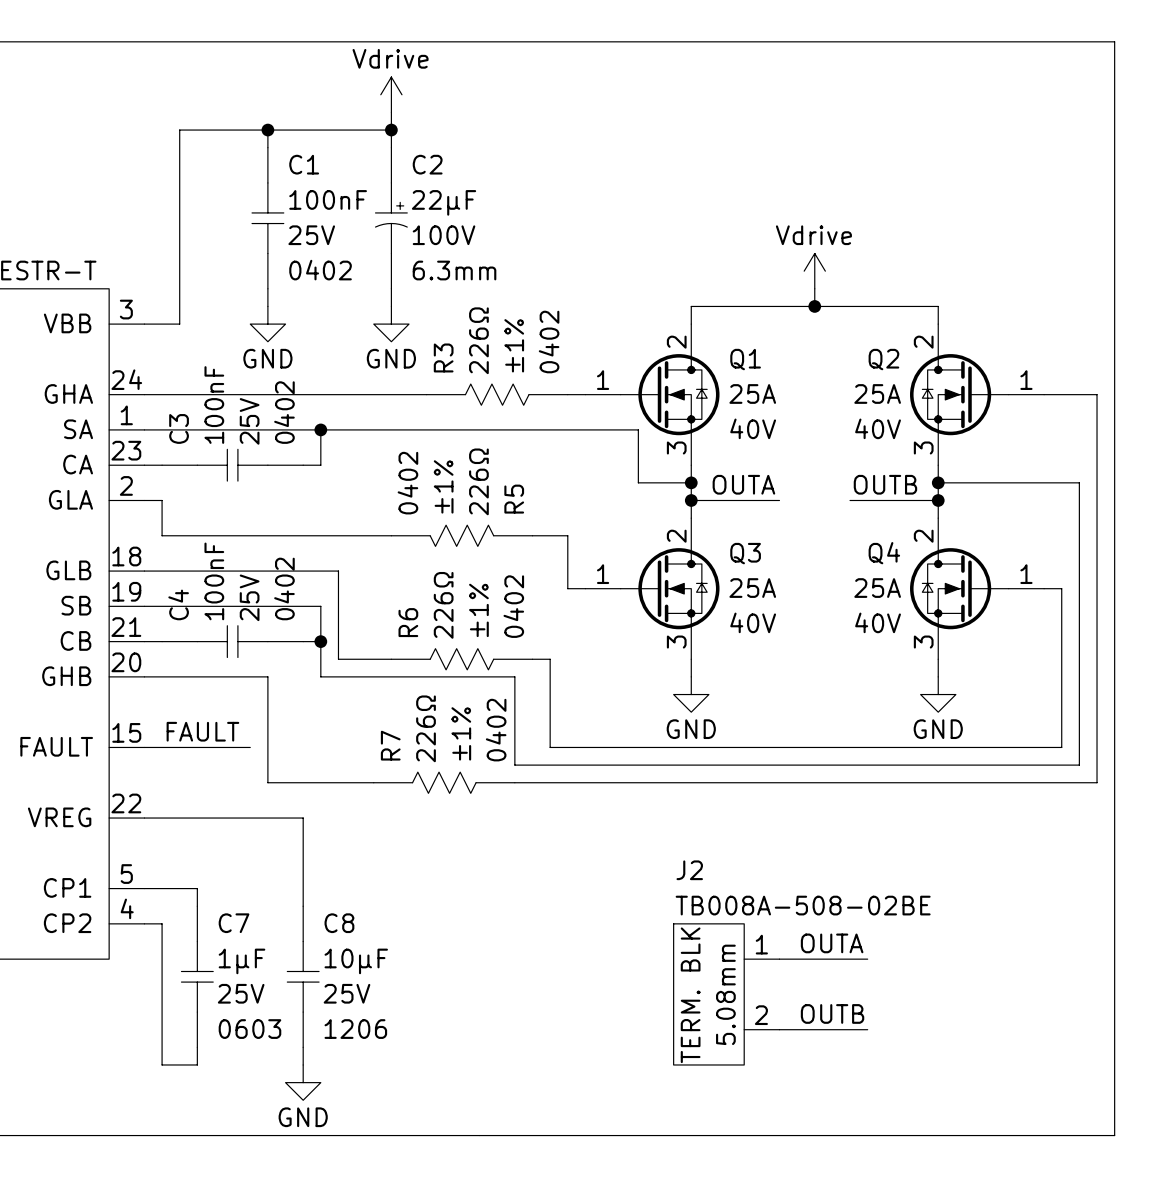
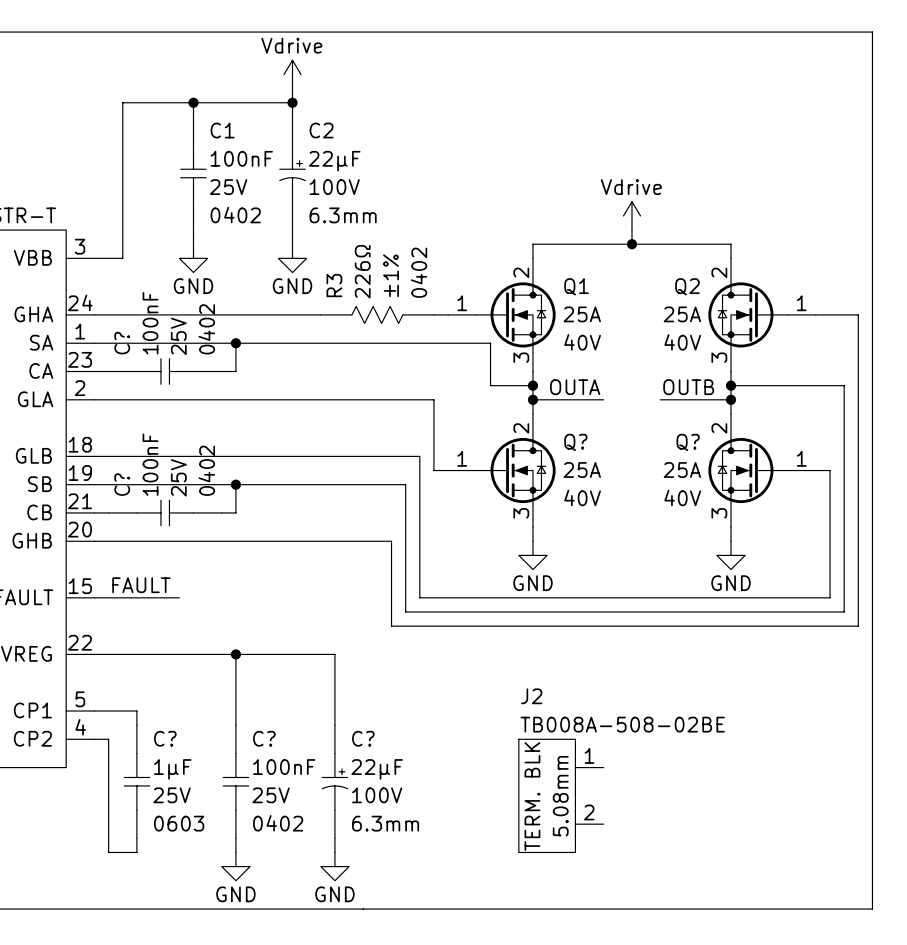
C3 name: C3 (179, 428) -> C? (122, 343)
wire: (162, 500) (162, 535) (391, 535) -> (108, 399) (433, 399) (433, 428)
R5: (461, 535) -> none
wire: (532, 535) (567, 535) -> none
Q3 name: Q3 (745, 553) -> Q? (575, 442)
Q4 name: Q4 (884, 553) -> Q? (688, 442)
wire: (338, 571) (338, 659) (391, 659) -> (250, 456) (419, 456) (419, 527)
C4 name: C4 (178, 604) -> C? (122, 484)
wire: none -> (235, 484) (405, 484) (405, 611)
wire: (320, 641) (320, 676) -> (193, 541) (235, 541)
junction position: (320, 641) -> (235, 484)
R6: (461, 659) -> none
wire: (532, 659) (550, 659) -> none
wire: (267, 676) (267, 782) (373, 782) -> none
wire: (514, 765) (532, 765) -> (391, 611) (391, 626)
R7: (444, 782) -> none
wire: (303, 818) (303, 906) -> (221, 654) (334, 654) (334, 725)
wire: none -> (235, 654) (235, 725)
junction: none -> (235, 654)
C7 name: C7 (234, 923) -> C? (165, 738)
label: OUTA (832, 943) -> none
wire: (779, 959) (867, 959) -> none
C8: (303, 976) -> none
C?: none -> (235, 781)
C?: none -> (334, 781)
label: OUTB (832, 1013) -> none
wire: (779, 1029) (867, 1029) -> none
wire: (303, 1047) (303, 1064) -> (235, 838) (235, 852)
wire: none -> (334, 838) (334, 852)
power symbol position: GND (303, 1082) -> GND (235, 866)
power symbol: none -> GND (334, 866)

